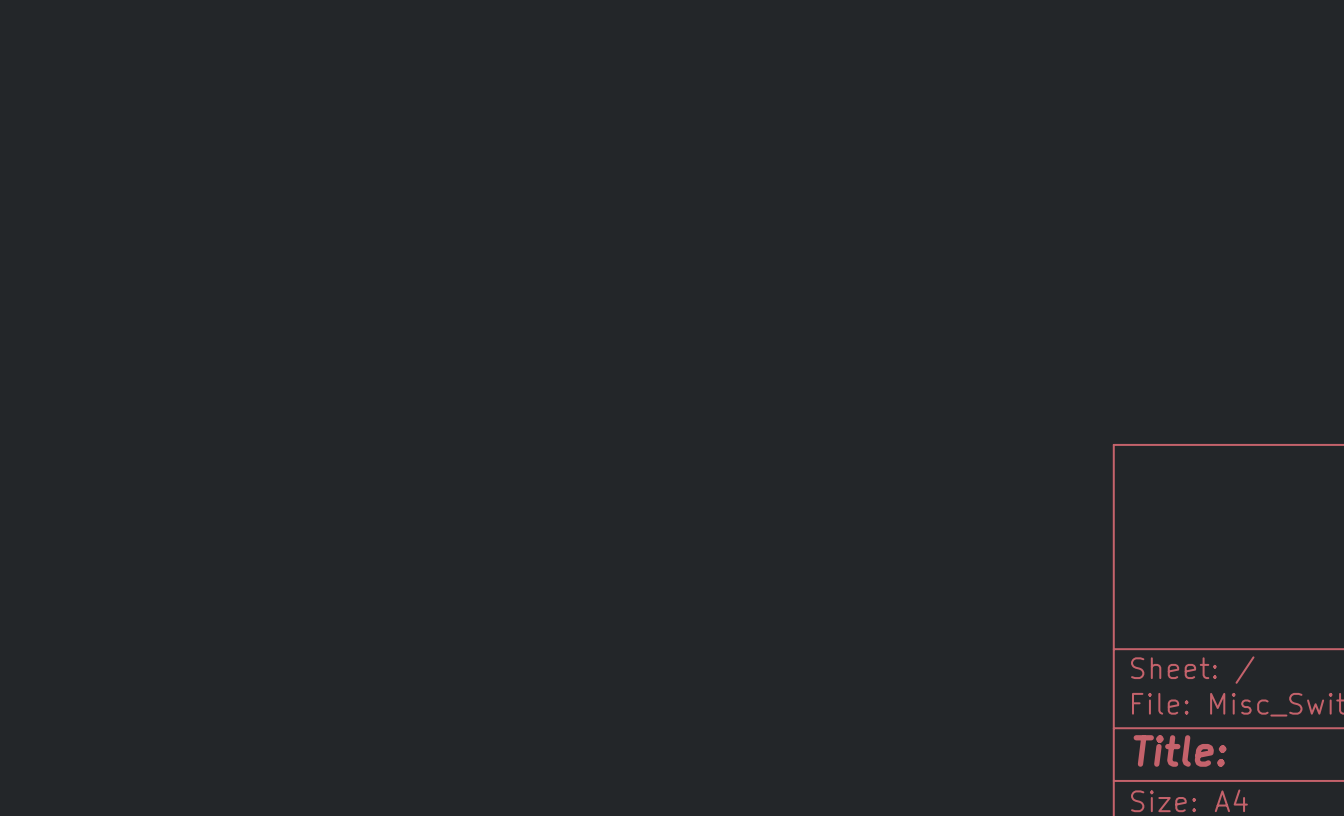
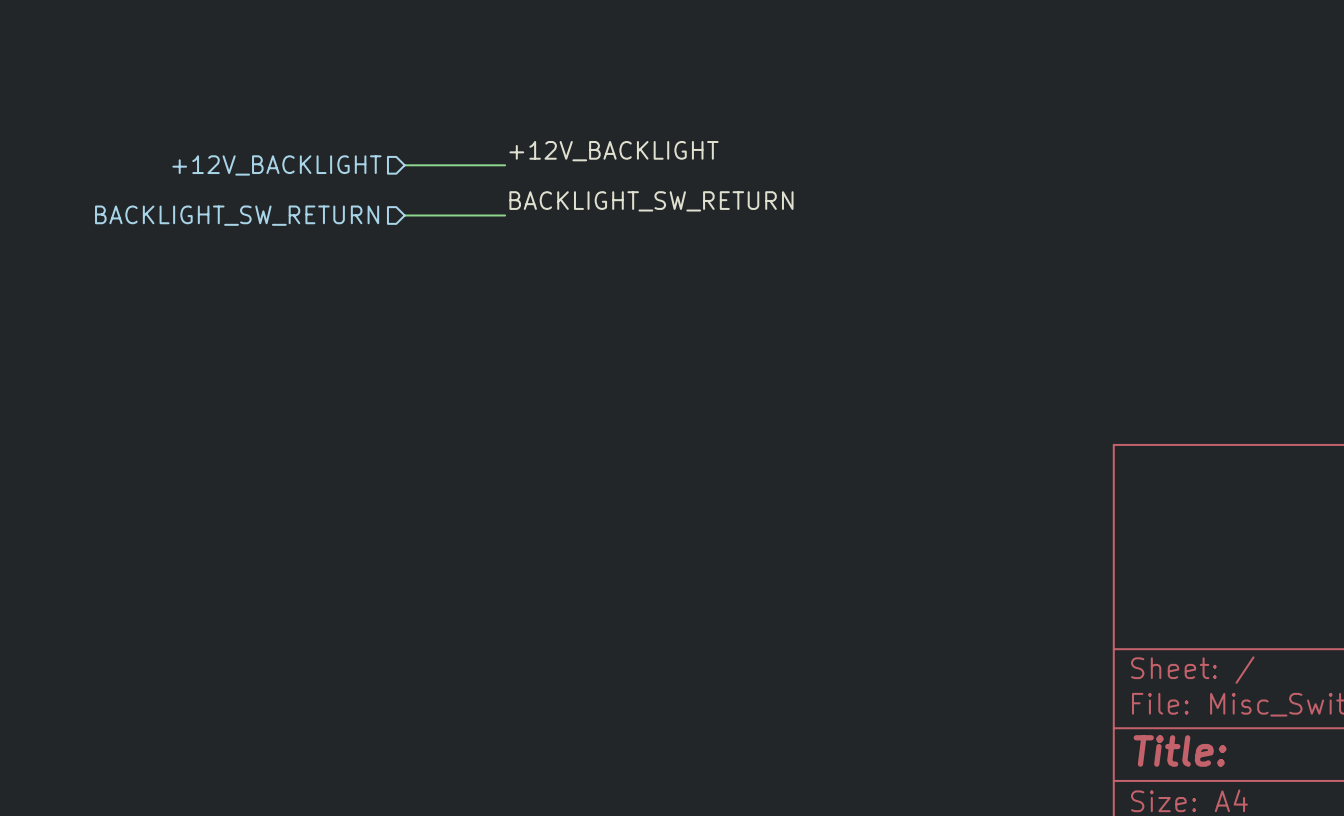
label: none -> +12V_BACKLIGHT (614, 151)
sheet pin: none -> +12V_BACKLIGHT (276, 165)
wire: none -> (404, 165) (505, 165)
label: none -> BACKLIGHT_SW_RETURN (651, 201)
sheet pin: none -> BACKLIGHT_SW_RETURN (237, 215)
wire: none -> (404, 215) (505, 215)

